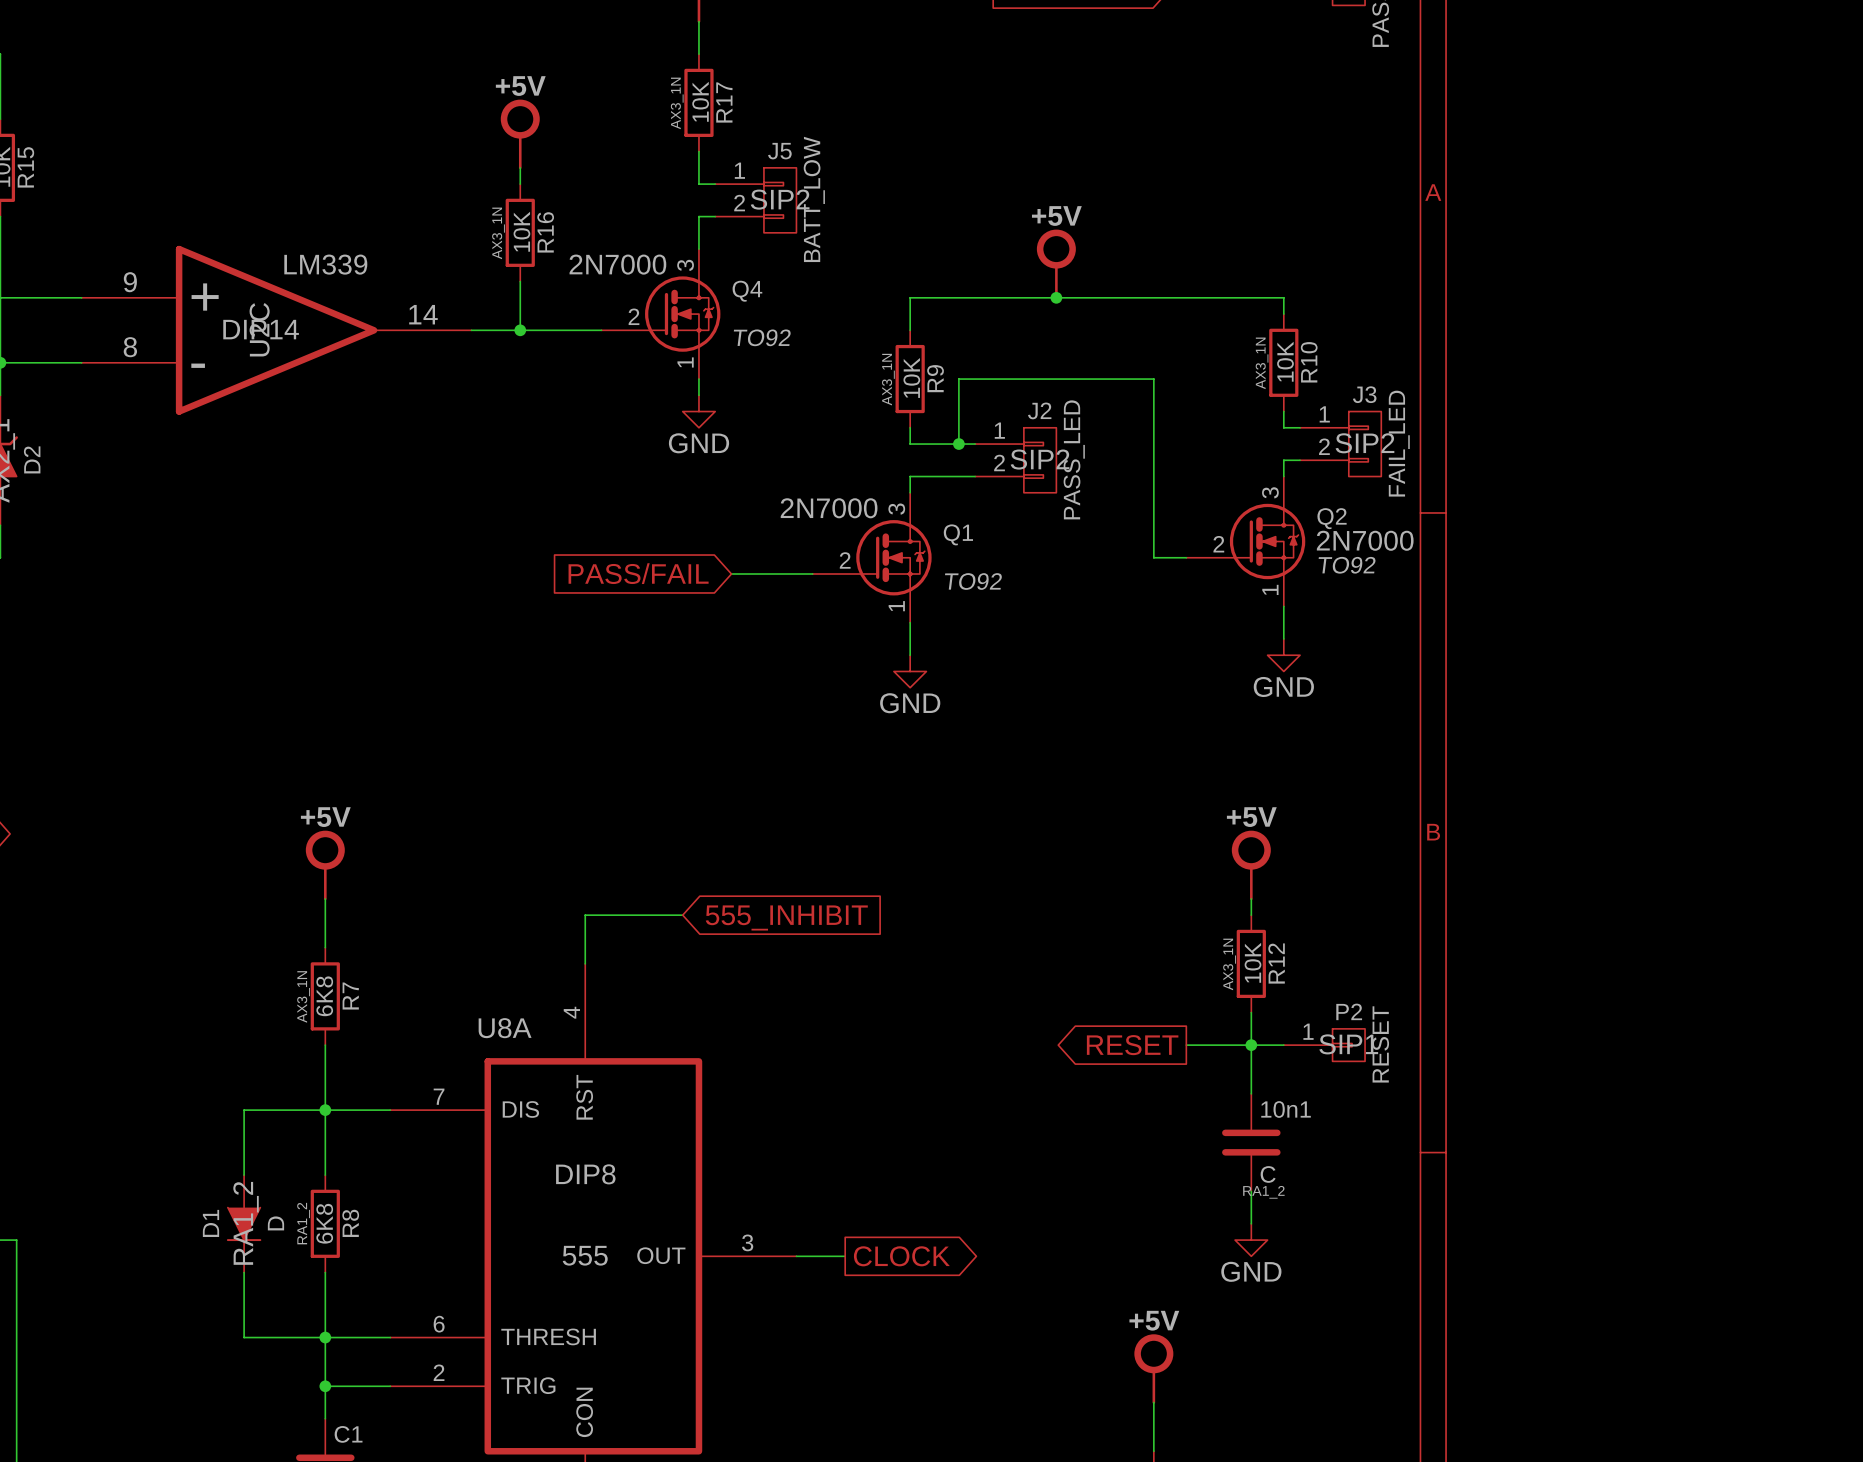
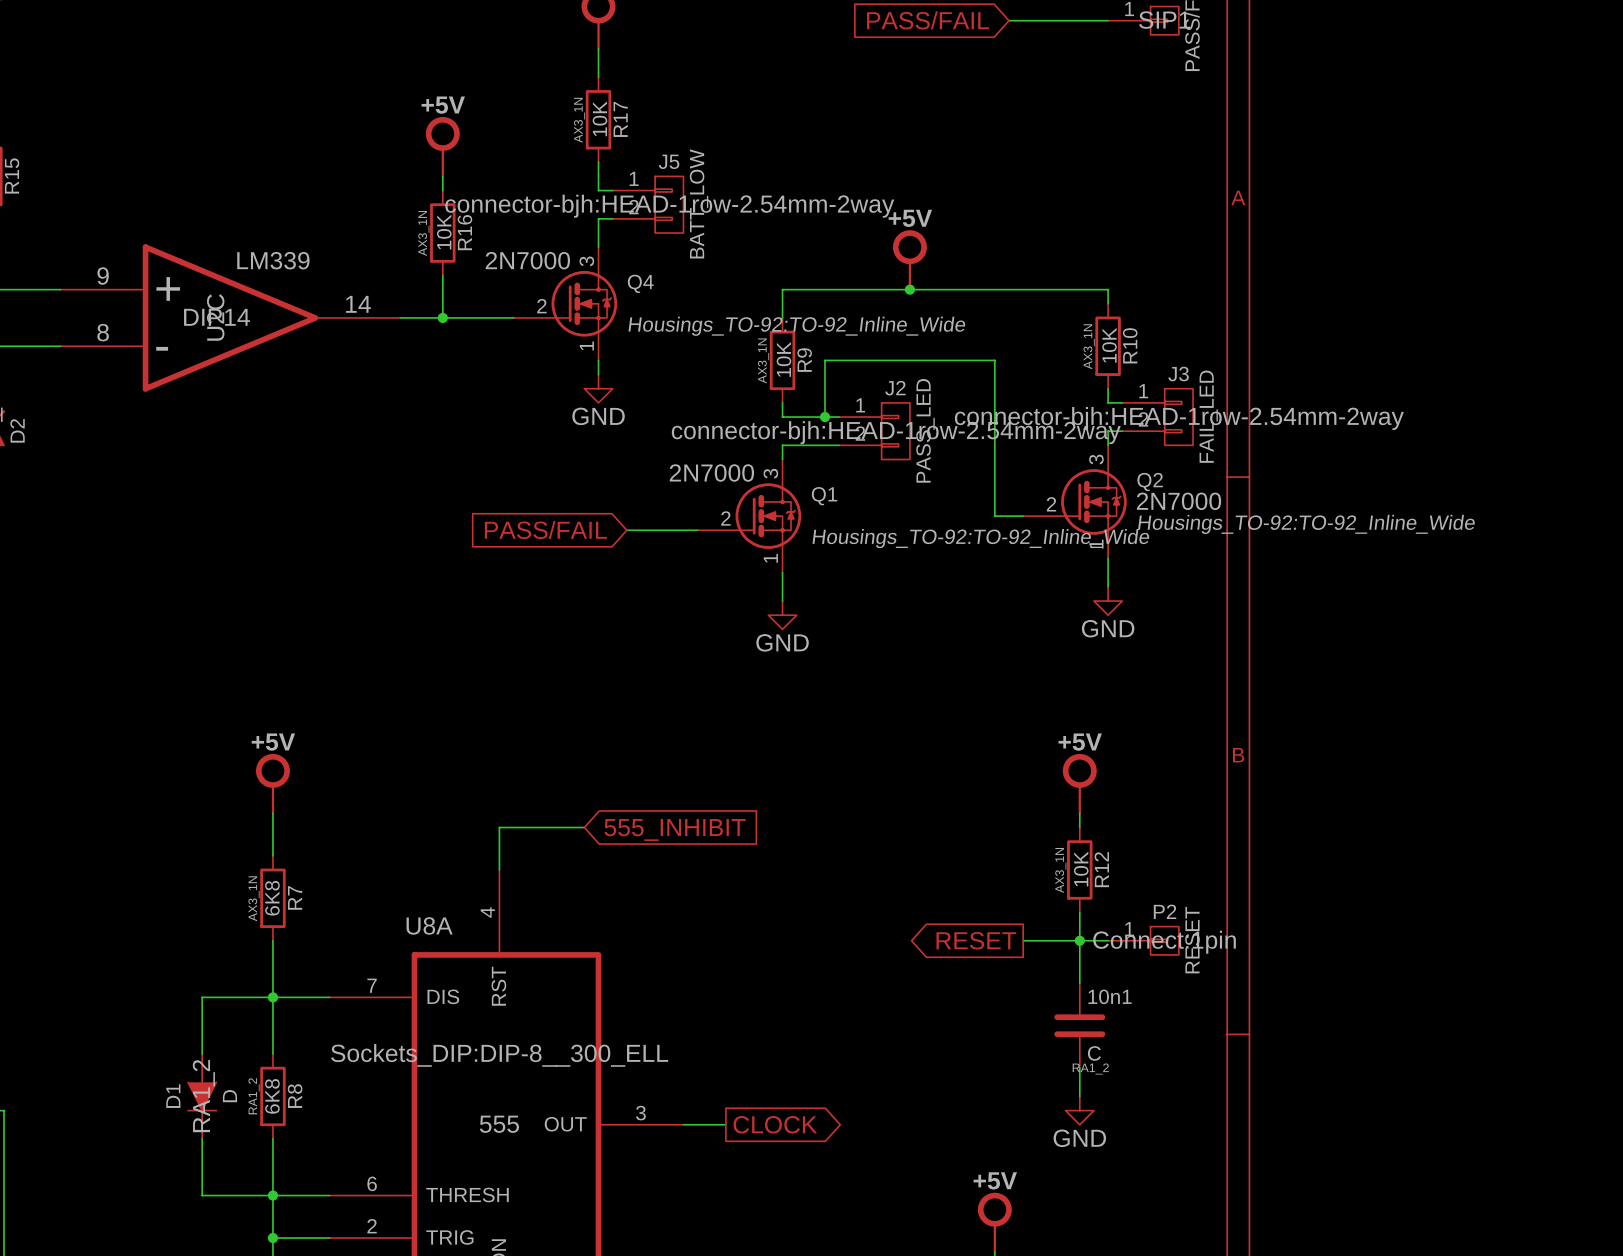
J5 text: SIP2 (780, 199) -> connector-bjh:HEAD-1row-2.54mm-2way (669, 206)
Q4 text: TO92 (762, 337) -> Housings_TO-92:TO-92_Inline_Wide (797, 326)
J3 text: SIP2 (1364, 443) -> connector-bjh:HEAD-1row-2.54mm-2way (1179, 418)
J2 text: SIP2 (1040, 459) -> connector-bjh:HEAD-1row-2.54mm-2way (896, 432)
Q2 text: TO92 (1347, 565) -> Housings_TO-92:TO-92_Inline_Wide (1306, 524)
Q1 text: TO92 (973, 581) -> Housings_TO-92:TO-92_Inline_Wide (981, 538)
P2 text: SIP1 (1348, 1044) -> Connect:1pin (1164, 942)
U8A text: DIP8 (585, 1174) -> Sockets_DIP:DIP-8__300_ELL (499, 1055)

